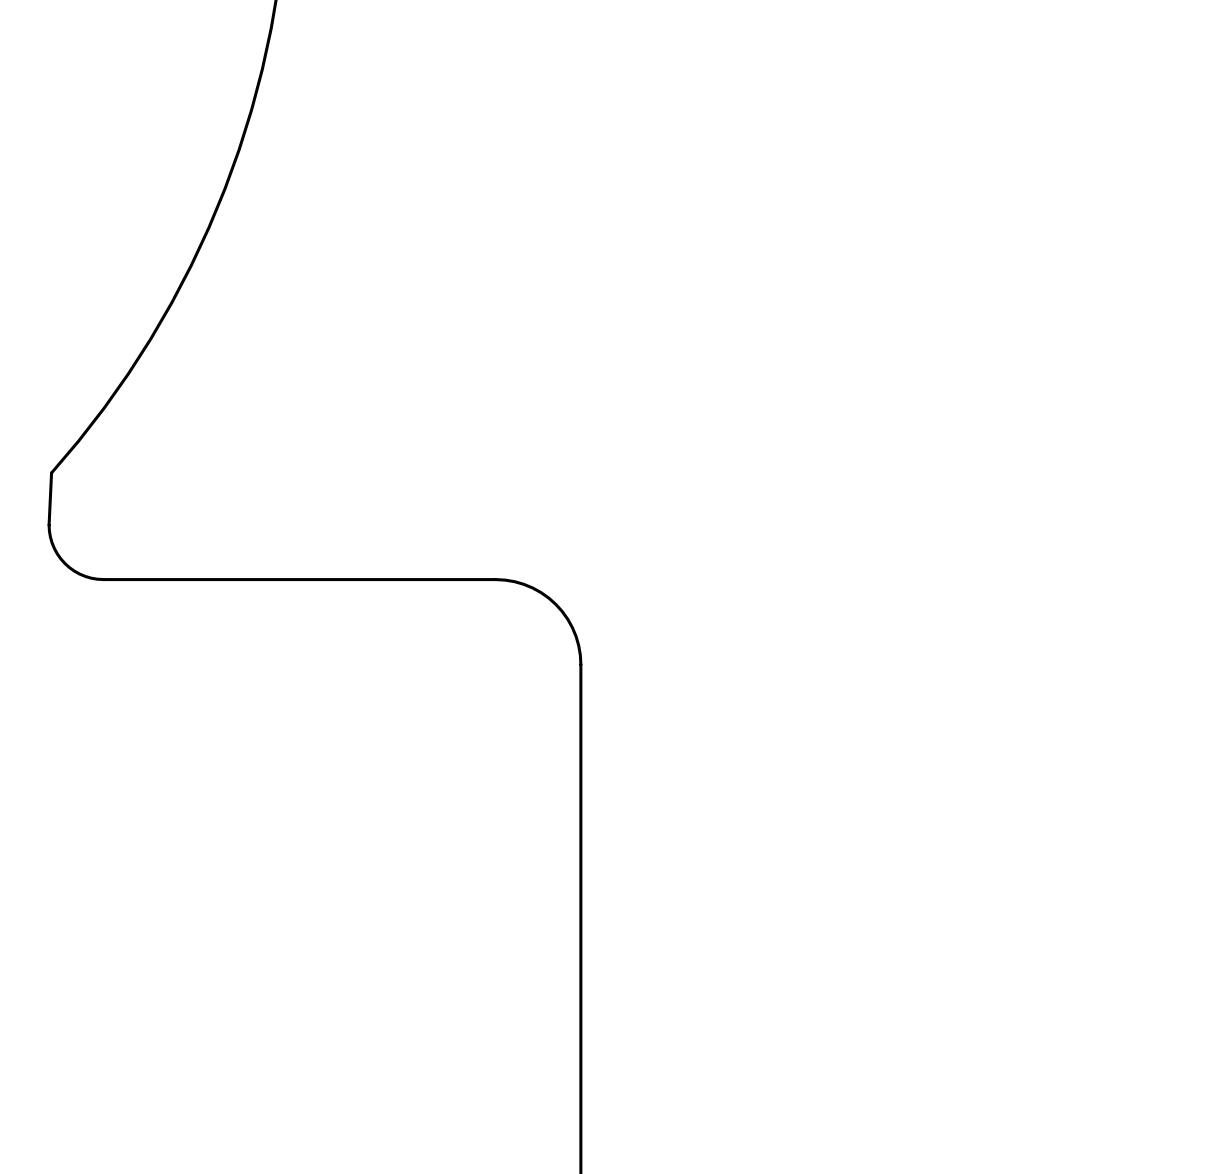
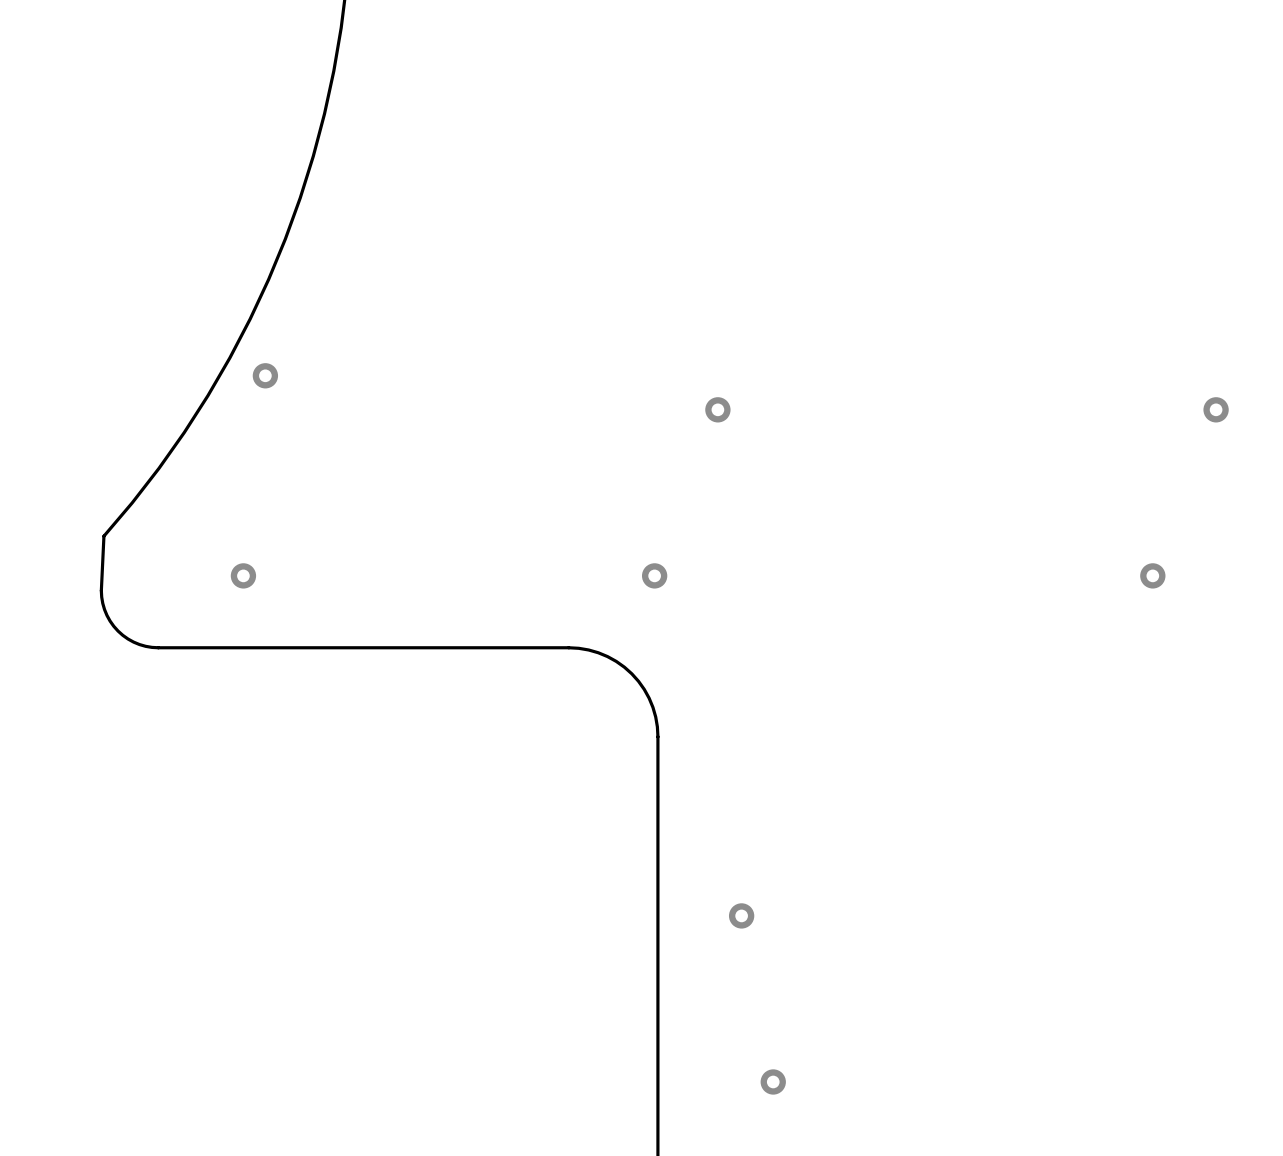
via: none -> (265, 375)
via: none -> (717, 409)
via: none -> (1216, 409)
via: none -> (243, 575)
via: none -> (654, 575)
via: none -> (1152, 575)
via: none -> (741, 915)
via: none -> (773, 1081)

